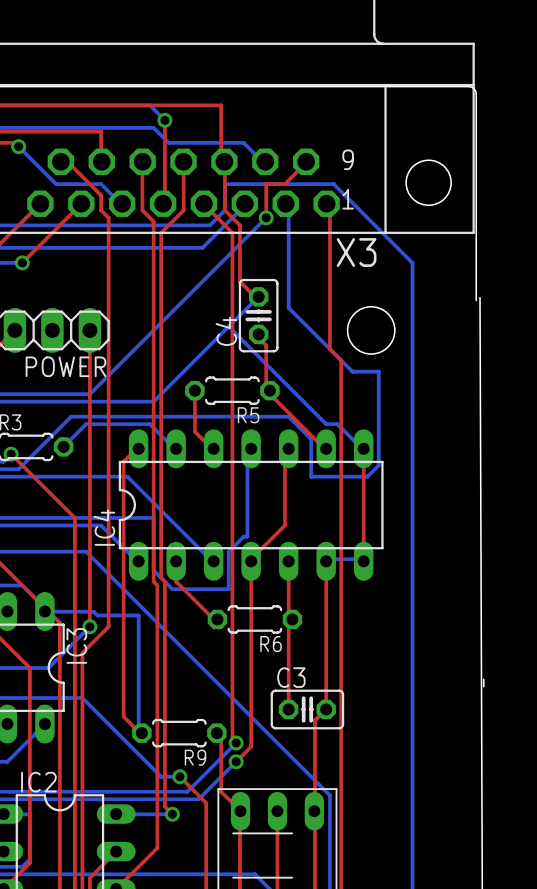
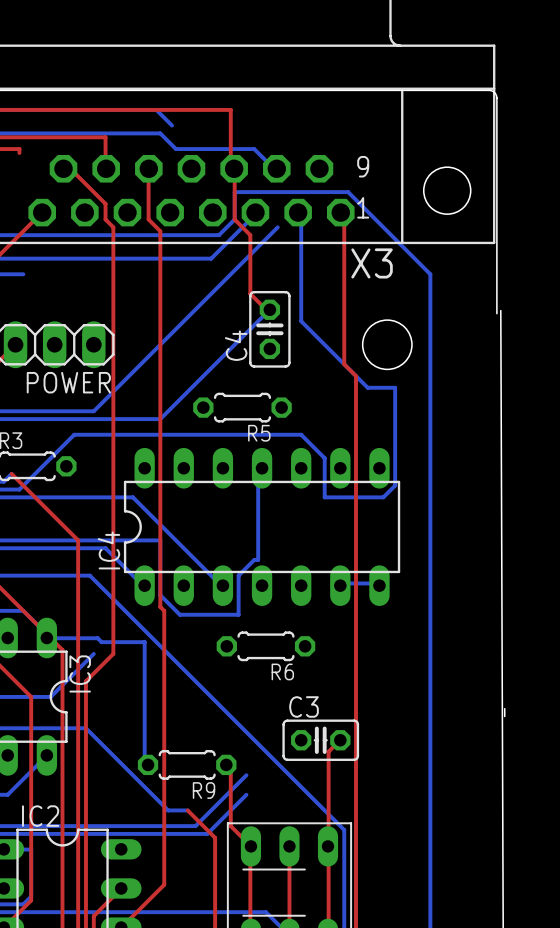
top track: (164, 120) (164, 202) (163, 203) -> none
via: (164, 120) -> none
bottom track: (18, 146) (56, 184) (101, 184) (122, 203) -> none
via: (18, 146) -> none
top track: (183, 161) (183, 210) (161, 232) (161, 577) (164, 581) (164, 806) (172, 814) -> none
top track: (306, 161) (284, 184) (266, 184) (266, 217) -> none
top track: (81, 203) (22, 262) -> none
top track: (203, 203) (232, 232) (232, 739) (236, 743) -> none
via: (266, 217) -> none
via: (22, 262) -> none
bottom track: (228, 326) (326, 424) (337, 424) (363, 448) -> none
top track: (89, 330) (89, 626) -> none
top track: (258, 334) (258, 337) (266, 345) (266, 390) (269, 390) (269, 394) (326, 448) -> none
top track: (194, 390) (194, 431) (213, 448) -> none
bottom track: (63, 446) (86, 424) (149, 424) (176, 448) -> none
top track: (138, 448) (123, 461) (123, 716) (141, 733) -> none
top track: (288, 448) (284, 450) (284, 525) (251, 559) (251, 746) (236, 761) -> none
top track: (363, 448) (363, 561) -> none
via: (11, 454) -> none
top track: (176, 561) (176, 581) (213, 619) (217, 619) -> none
top track: (288, 561) (288, 619) (292, 619) (288, 622) (288, 709) -> none
top track: (326, 561) (326, 709) -> none
via: (89, 626) -> none
via: (236, 743) -> none
via: (236, 761) -> none
via: (179, 776) -> none
bottom track: (116, 814) (172, 814) -> none
via: (172, 814) -> none

